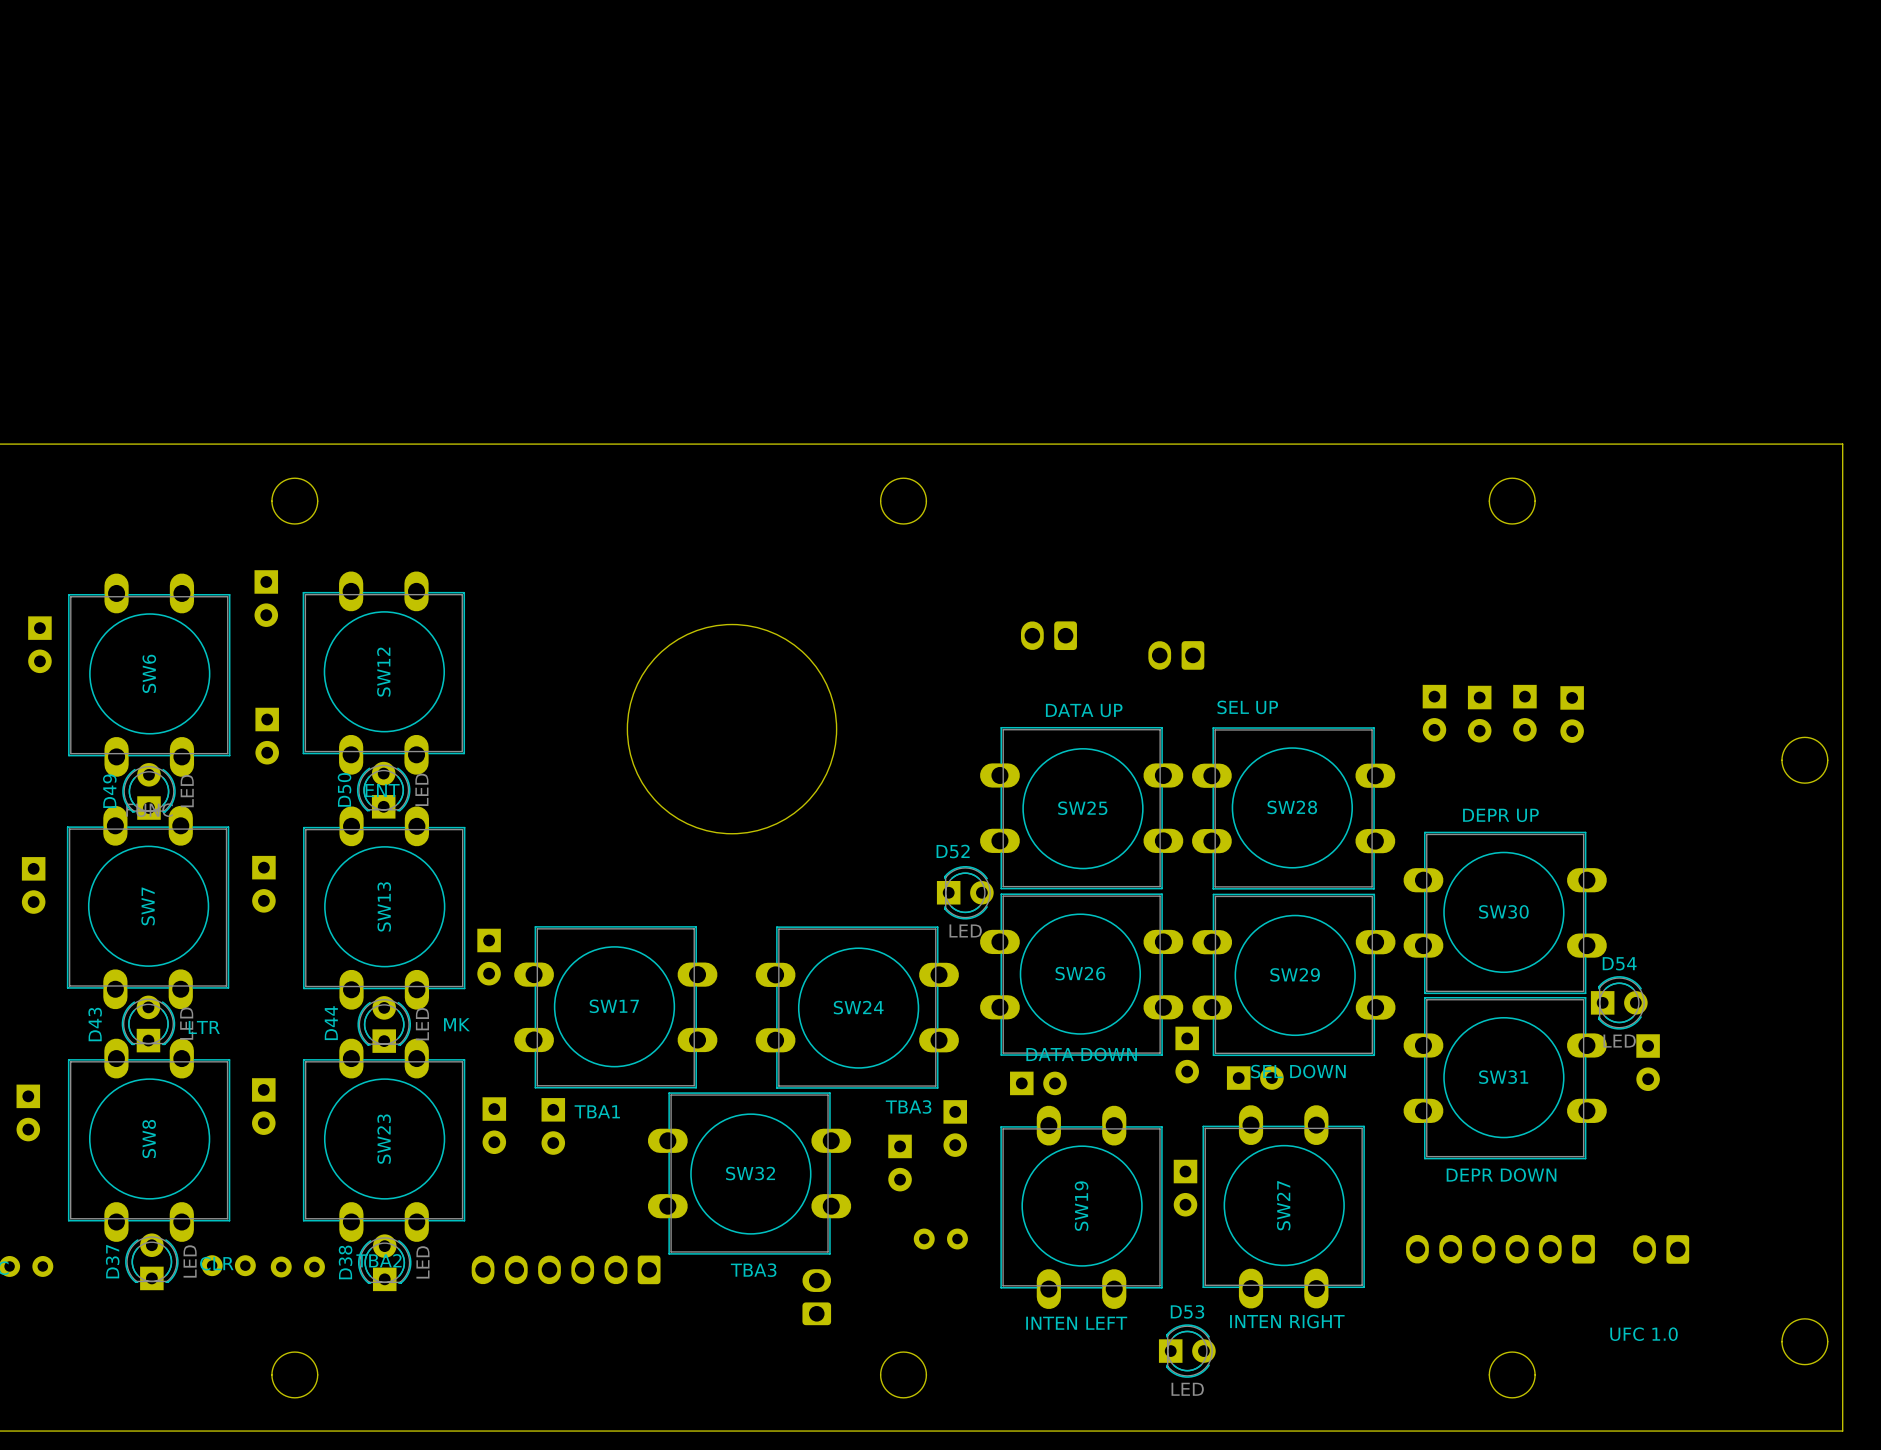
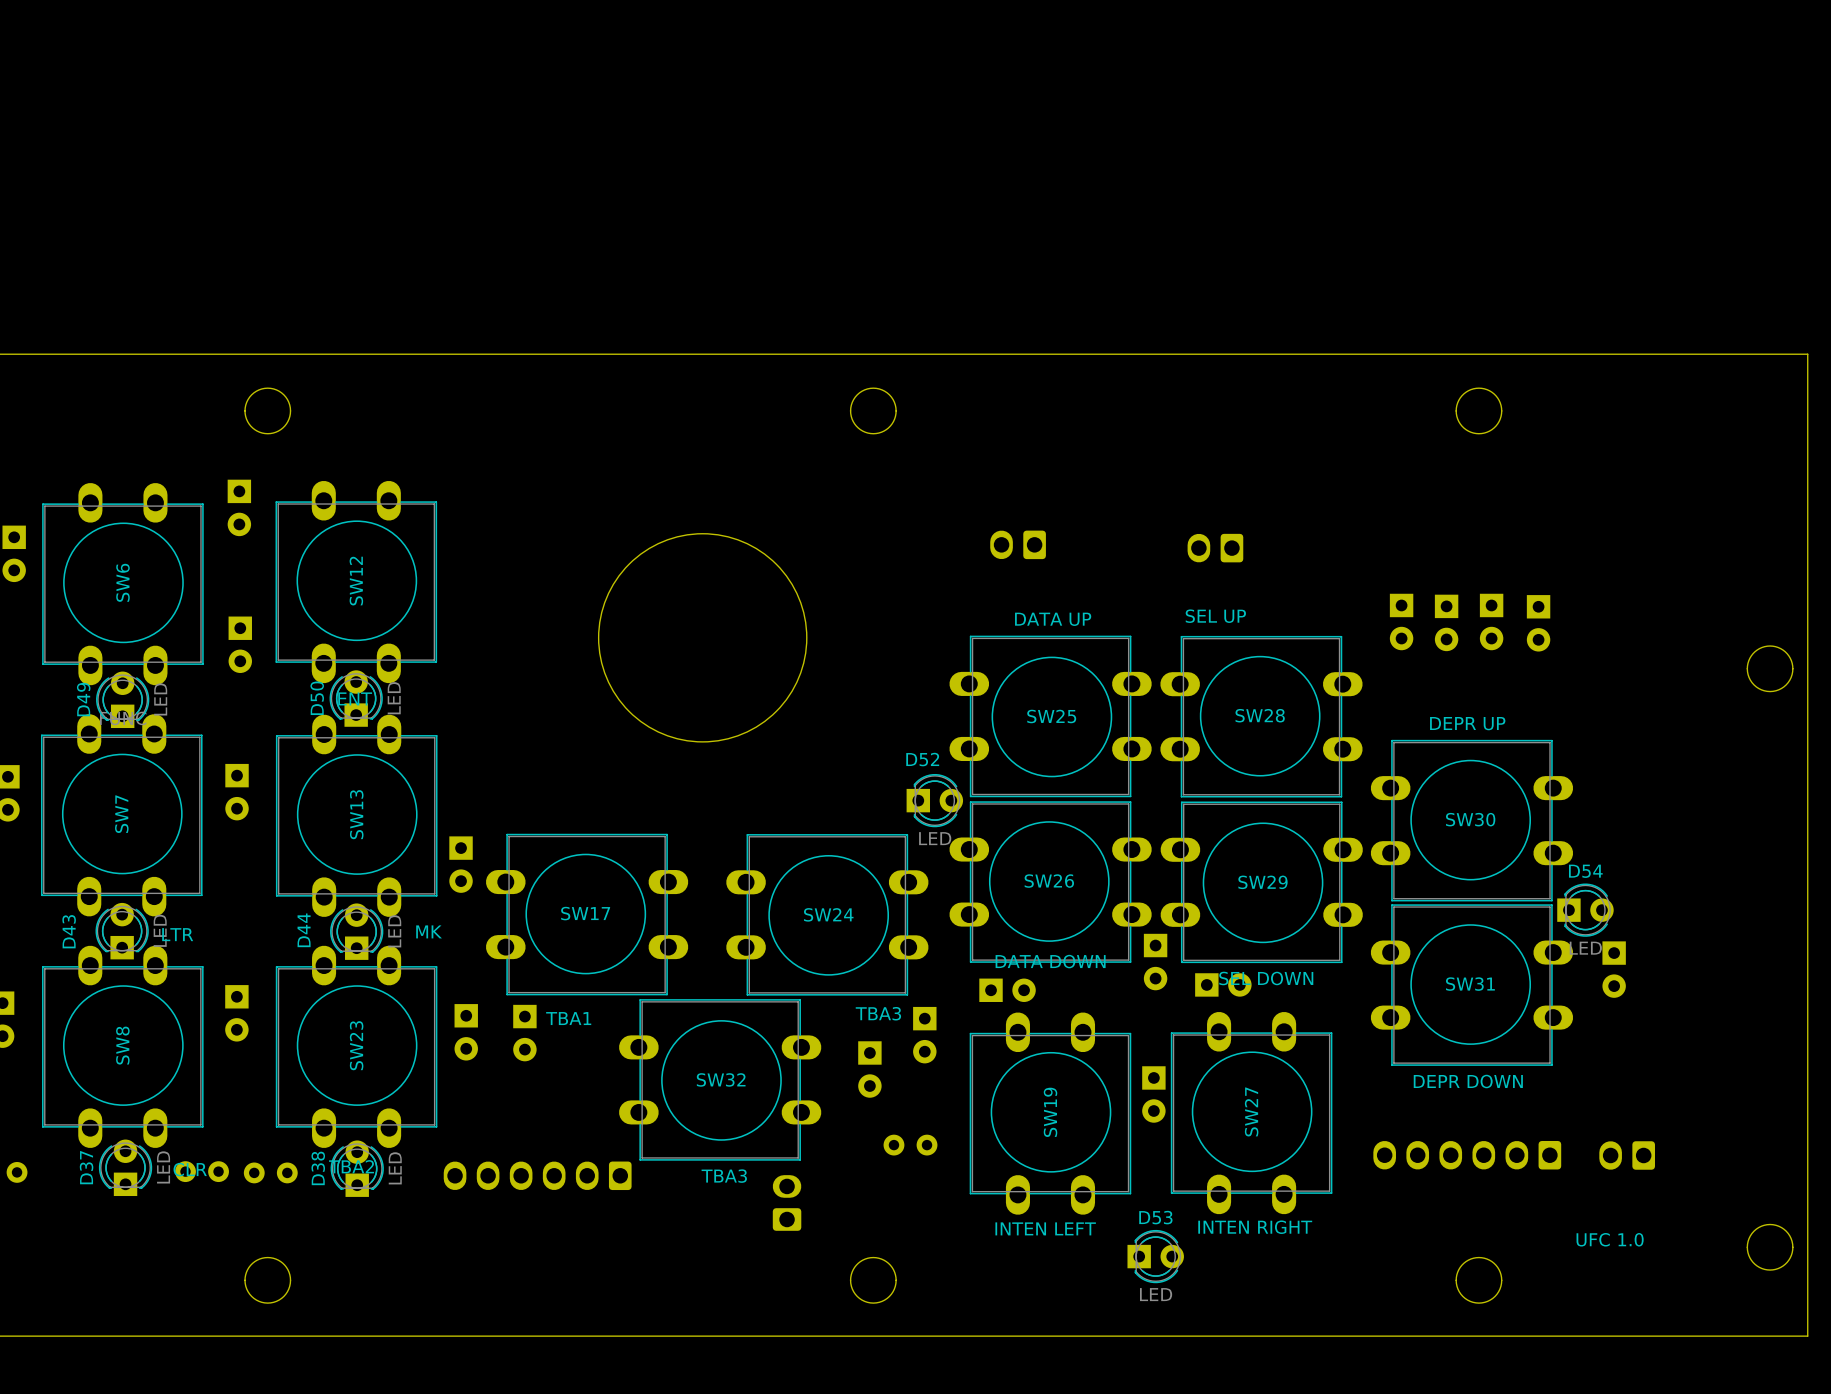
part position: (1176, 655) -> (1215, 548)

